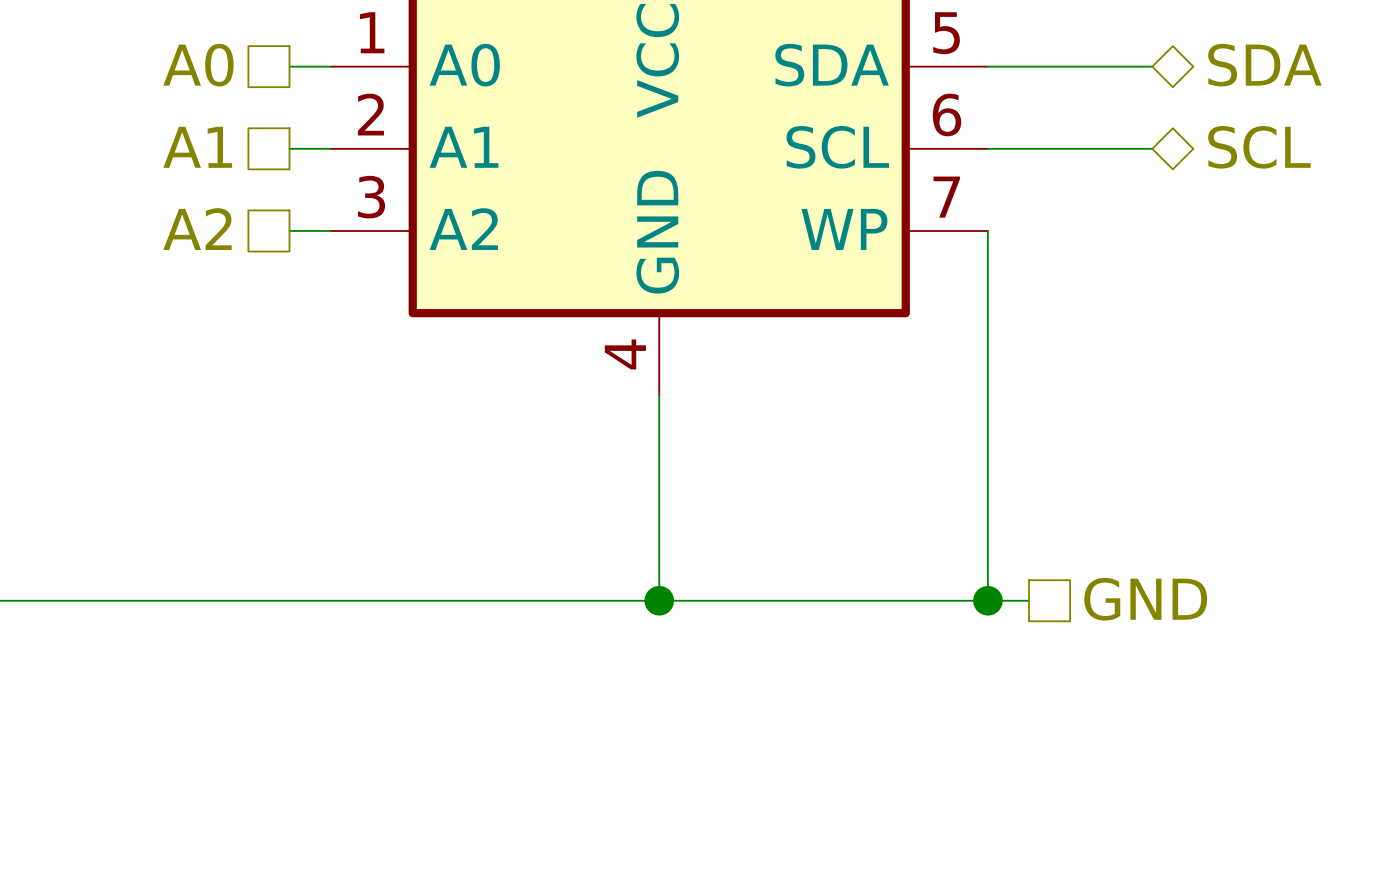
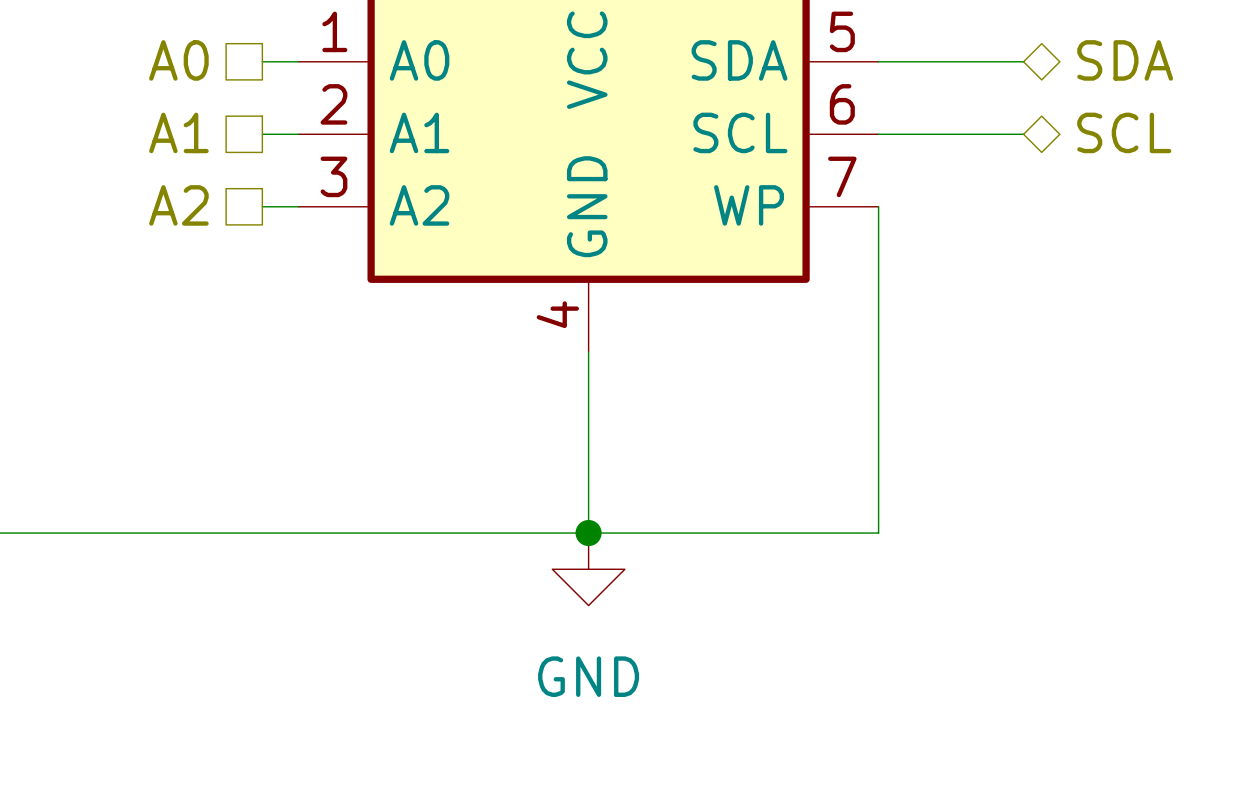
hierarchical label: GND (1145, 599) -> none
wire: (987, 600) (1029, 600) -> none
junction: (987, 600) -> none
power symbol: none -> GND (588, 569)

